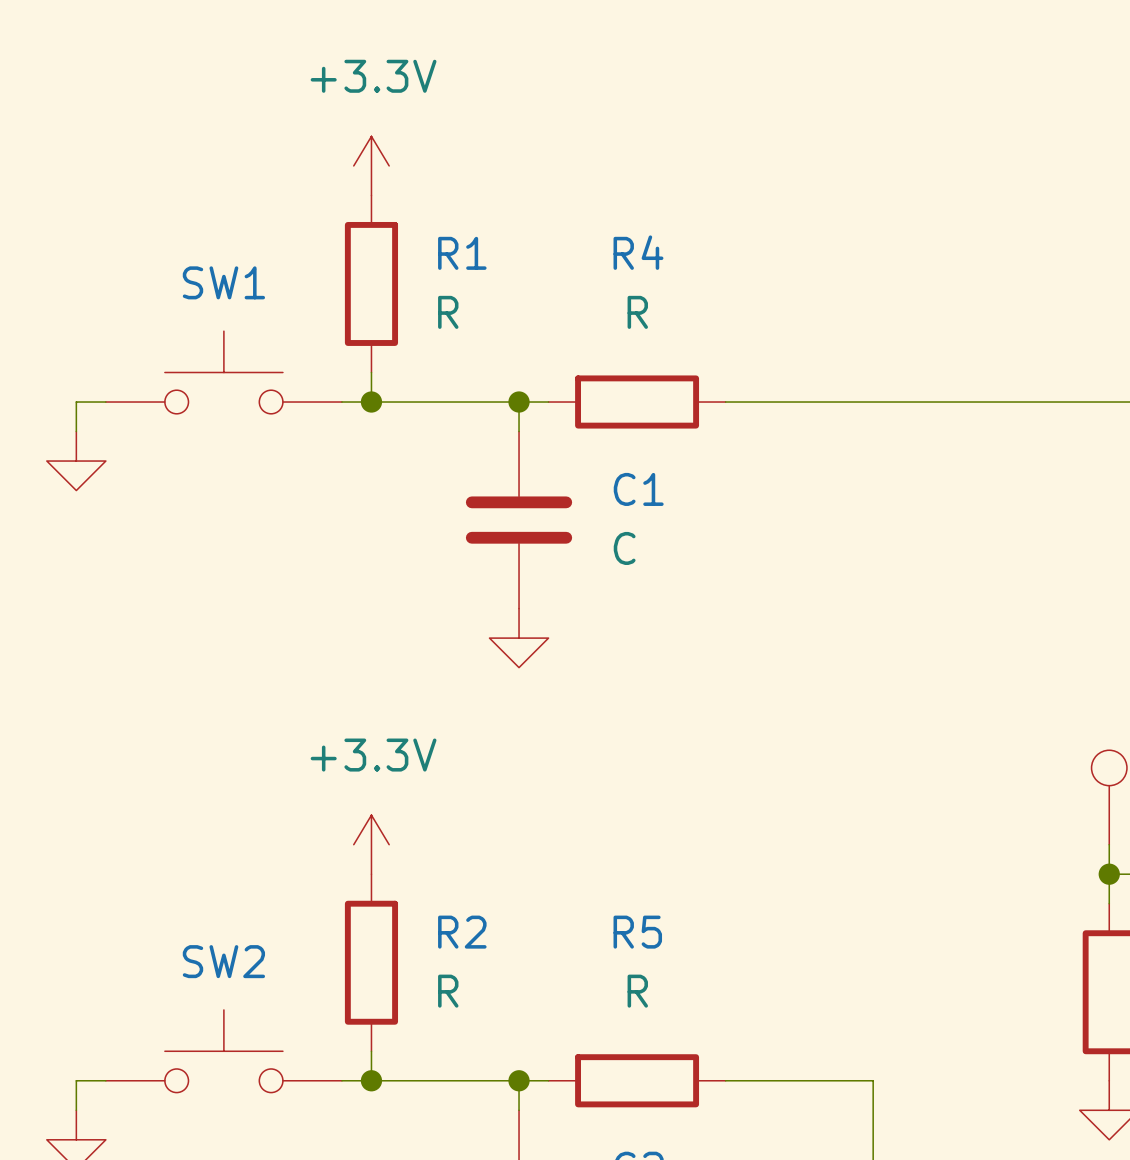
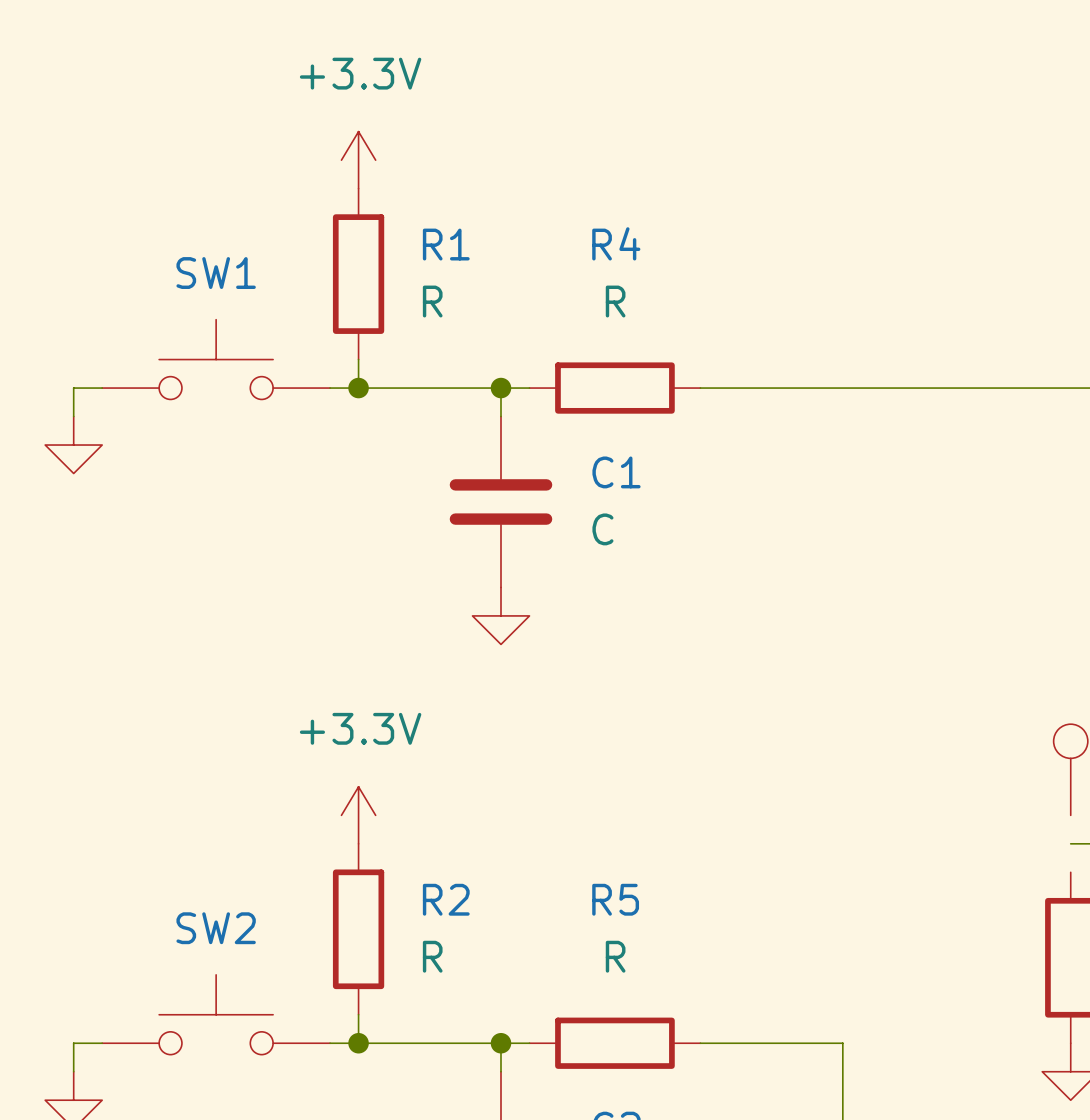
wire: (1109, 844) (1109, 903) -> none
junction: (1109, 874) -> none

